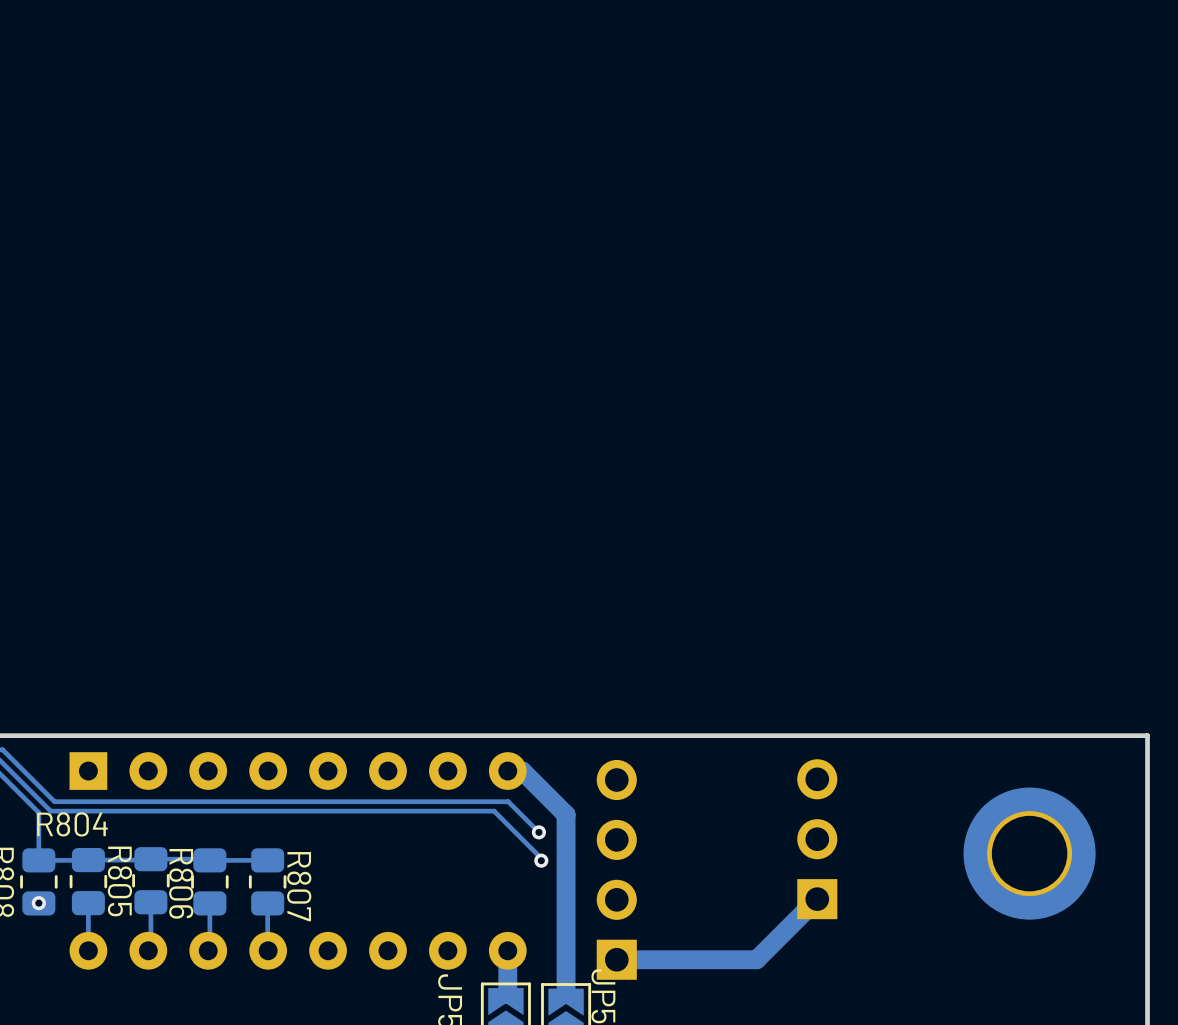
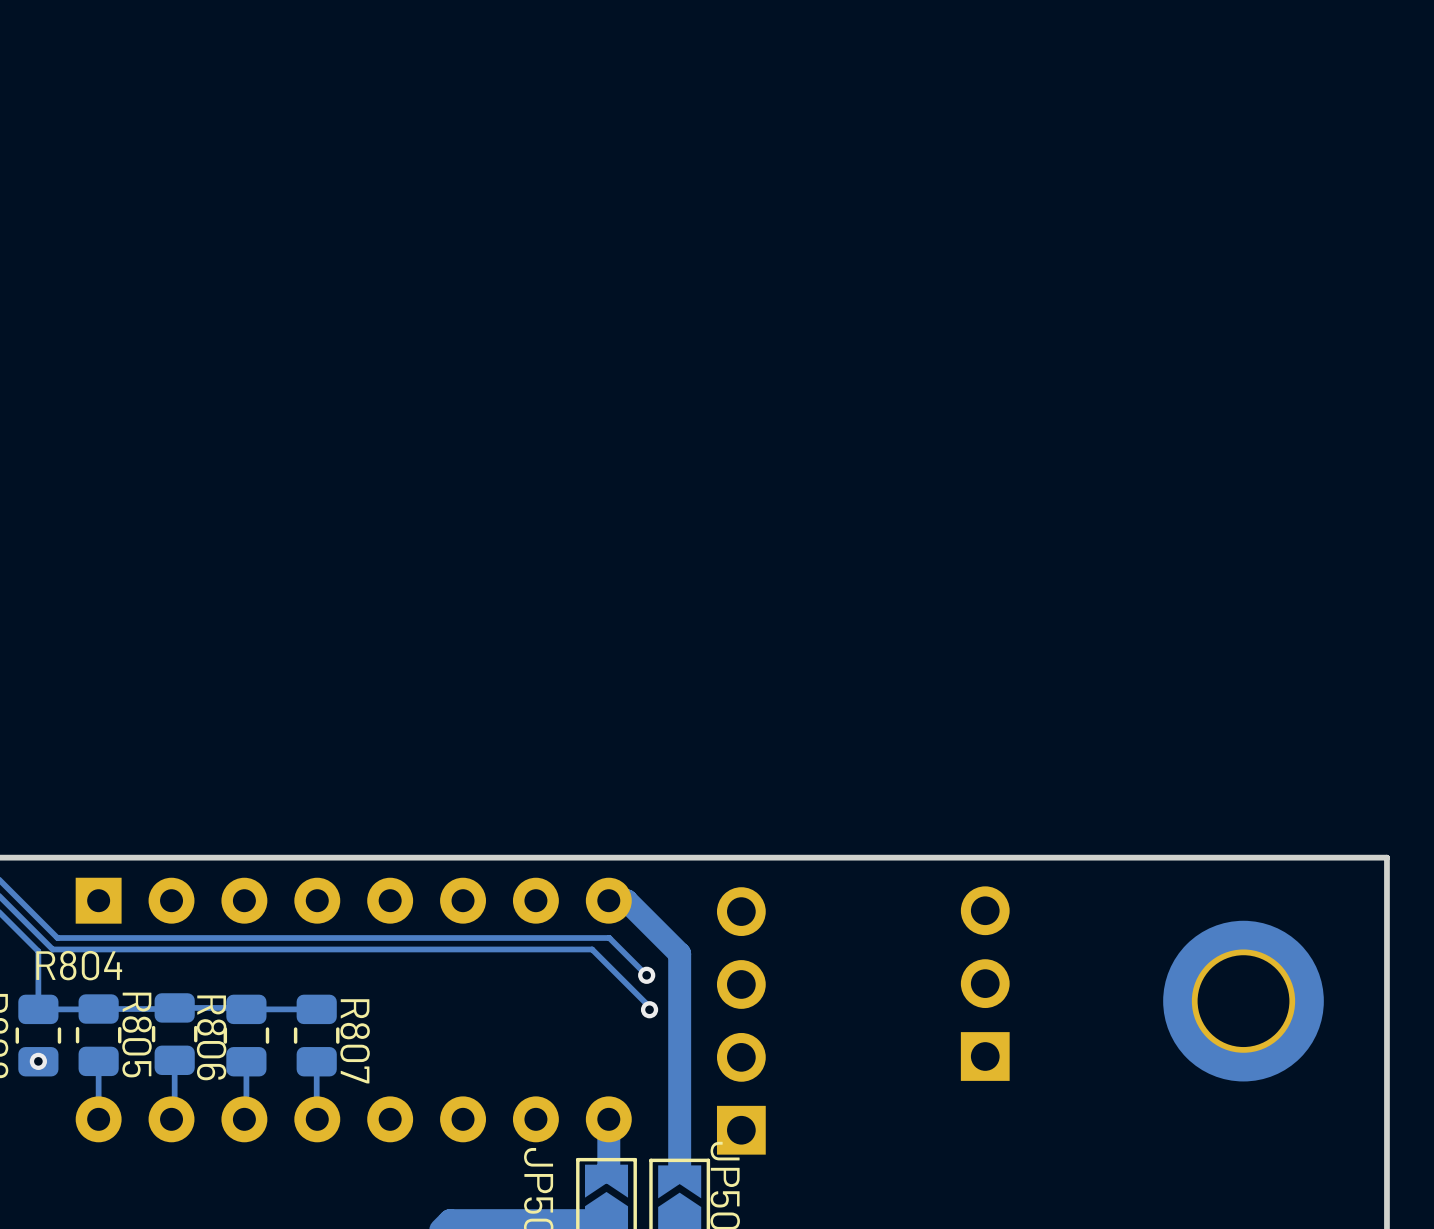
track: (817, 899) (756, 959) (616, 959) -> none

